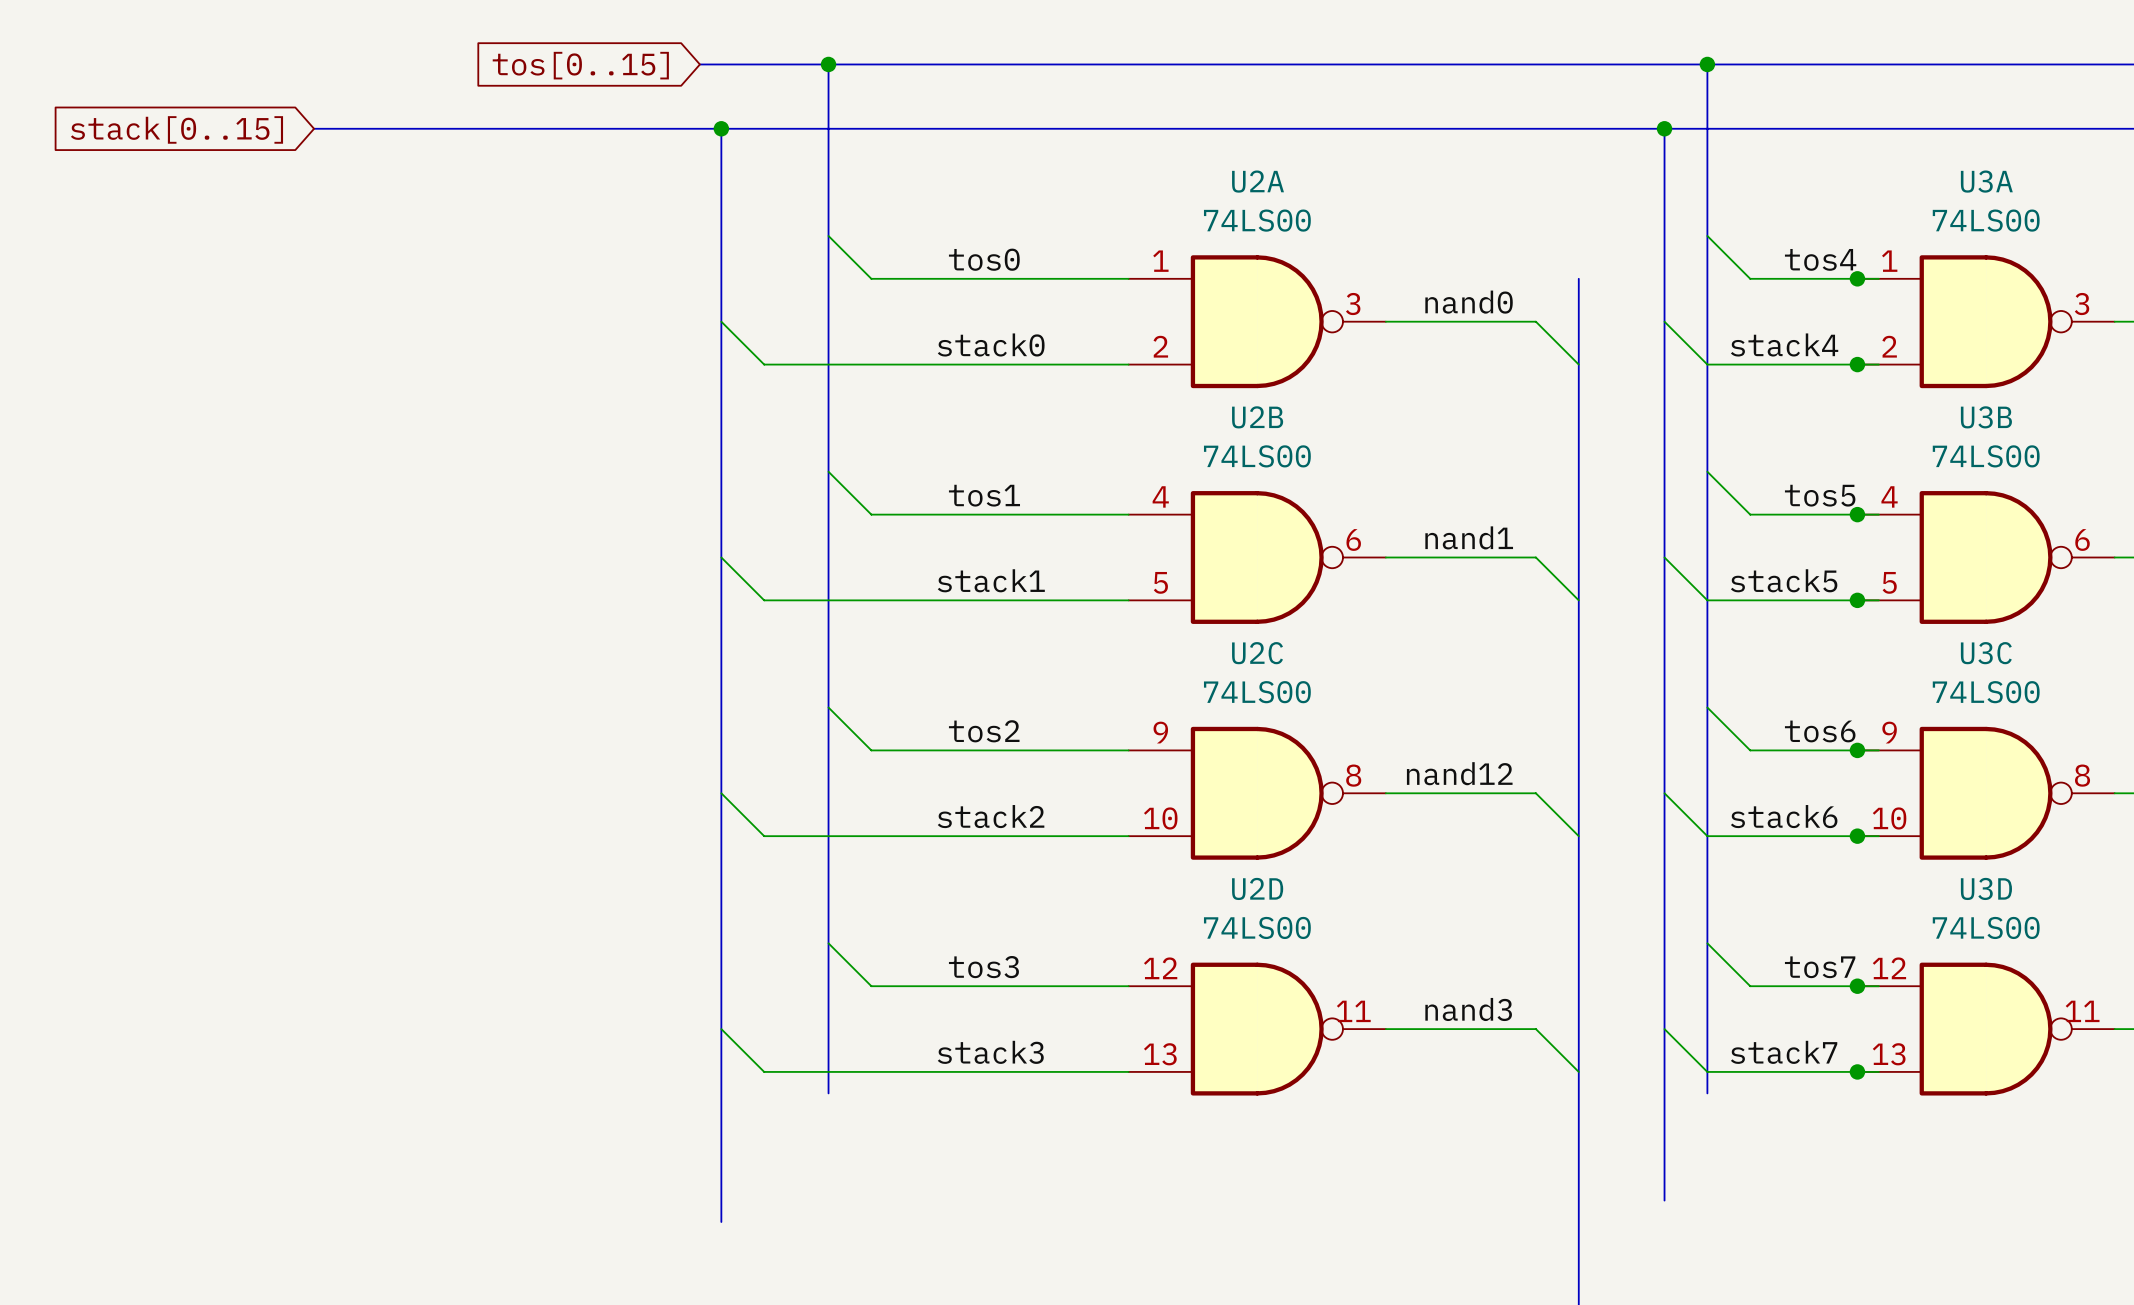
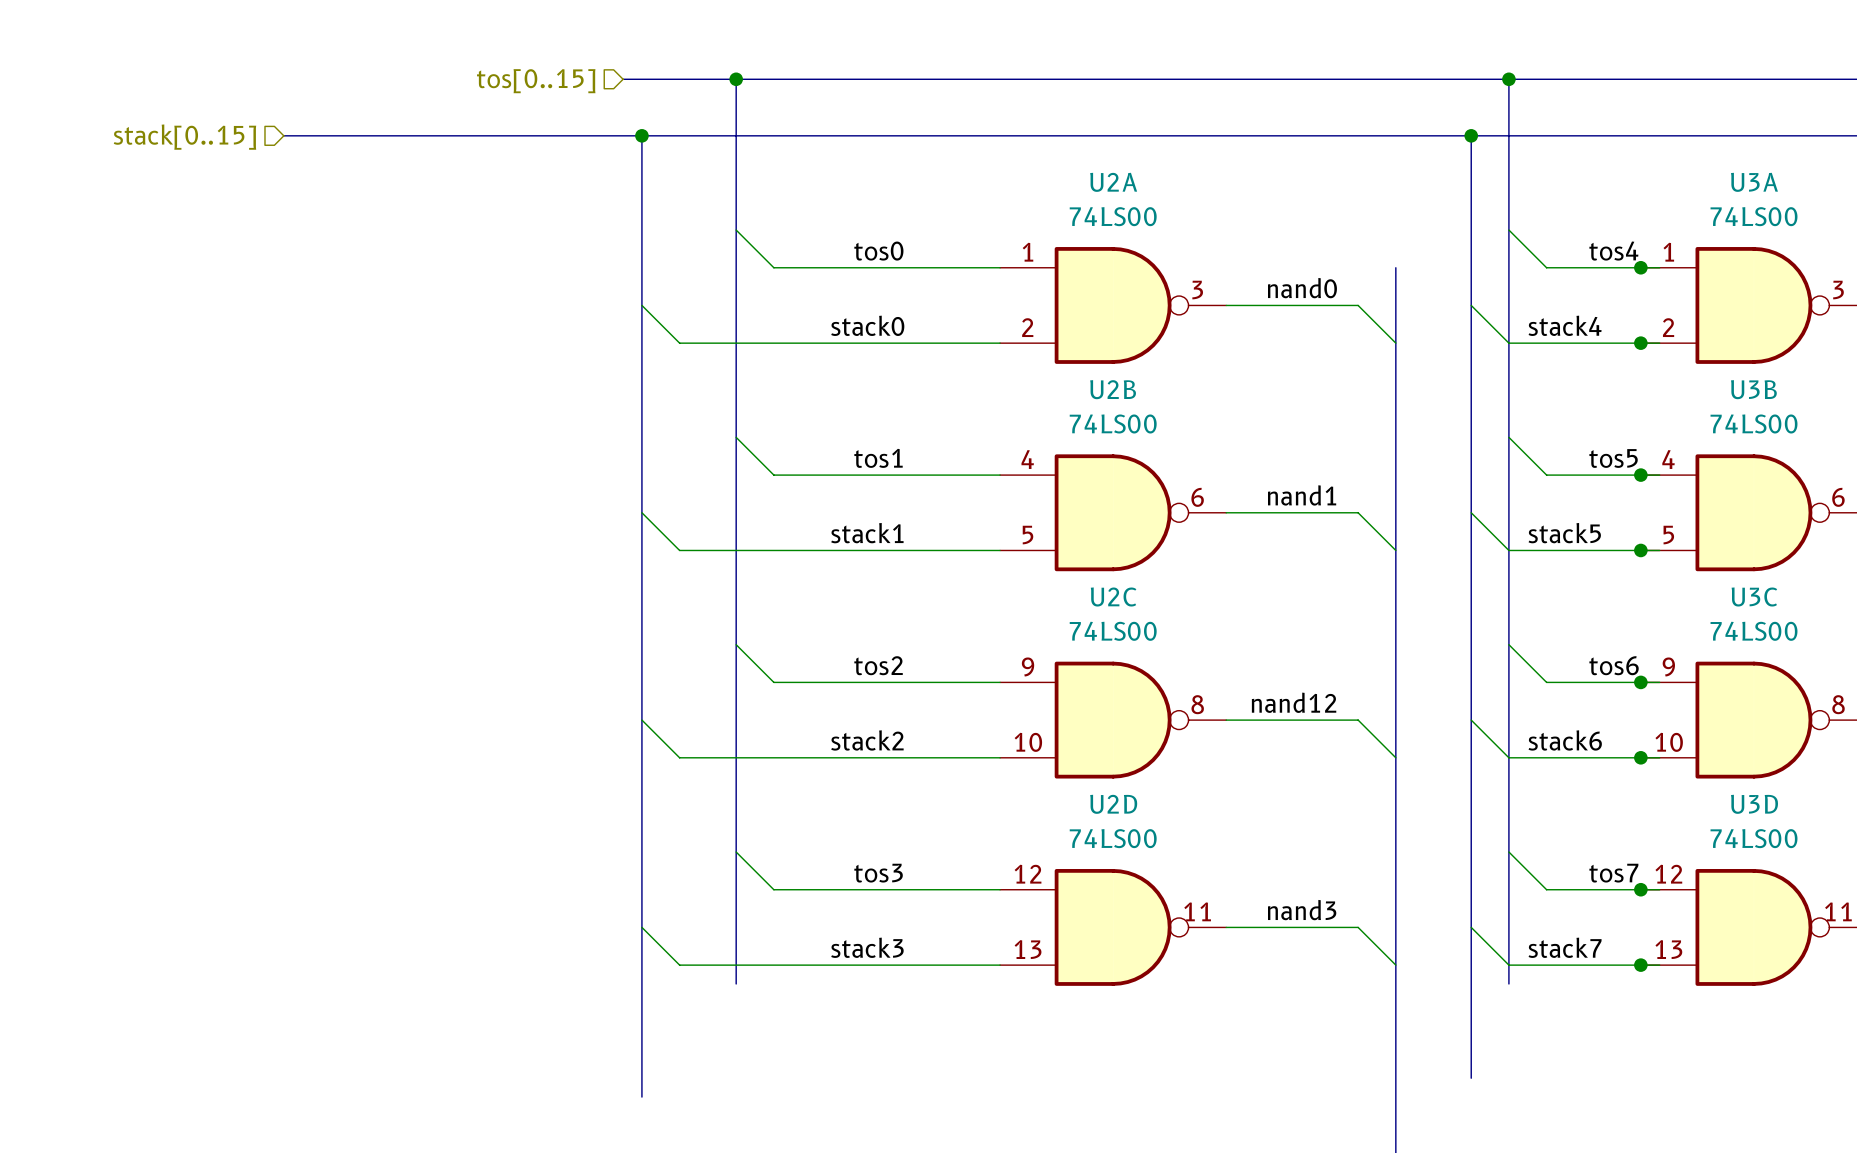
hierarchical label: none -> tos[0..15] (536, 81)
global label: tos[0..15] (580, 65) -> none
hierarchical label: none -> stack[0..15] (184, 137)
global label: stack[0..15] (176, 129) -> none

